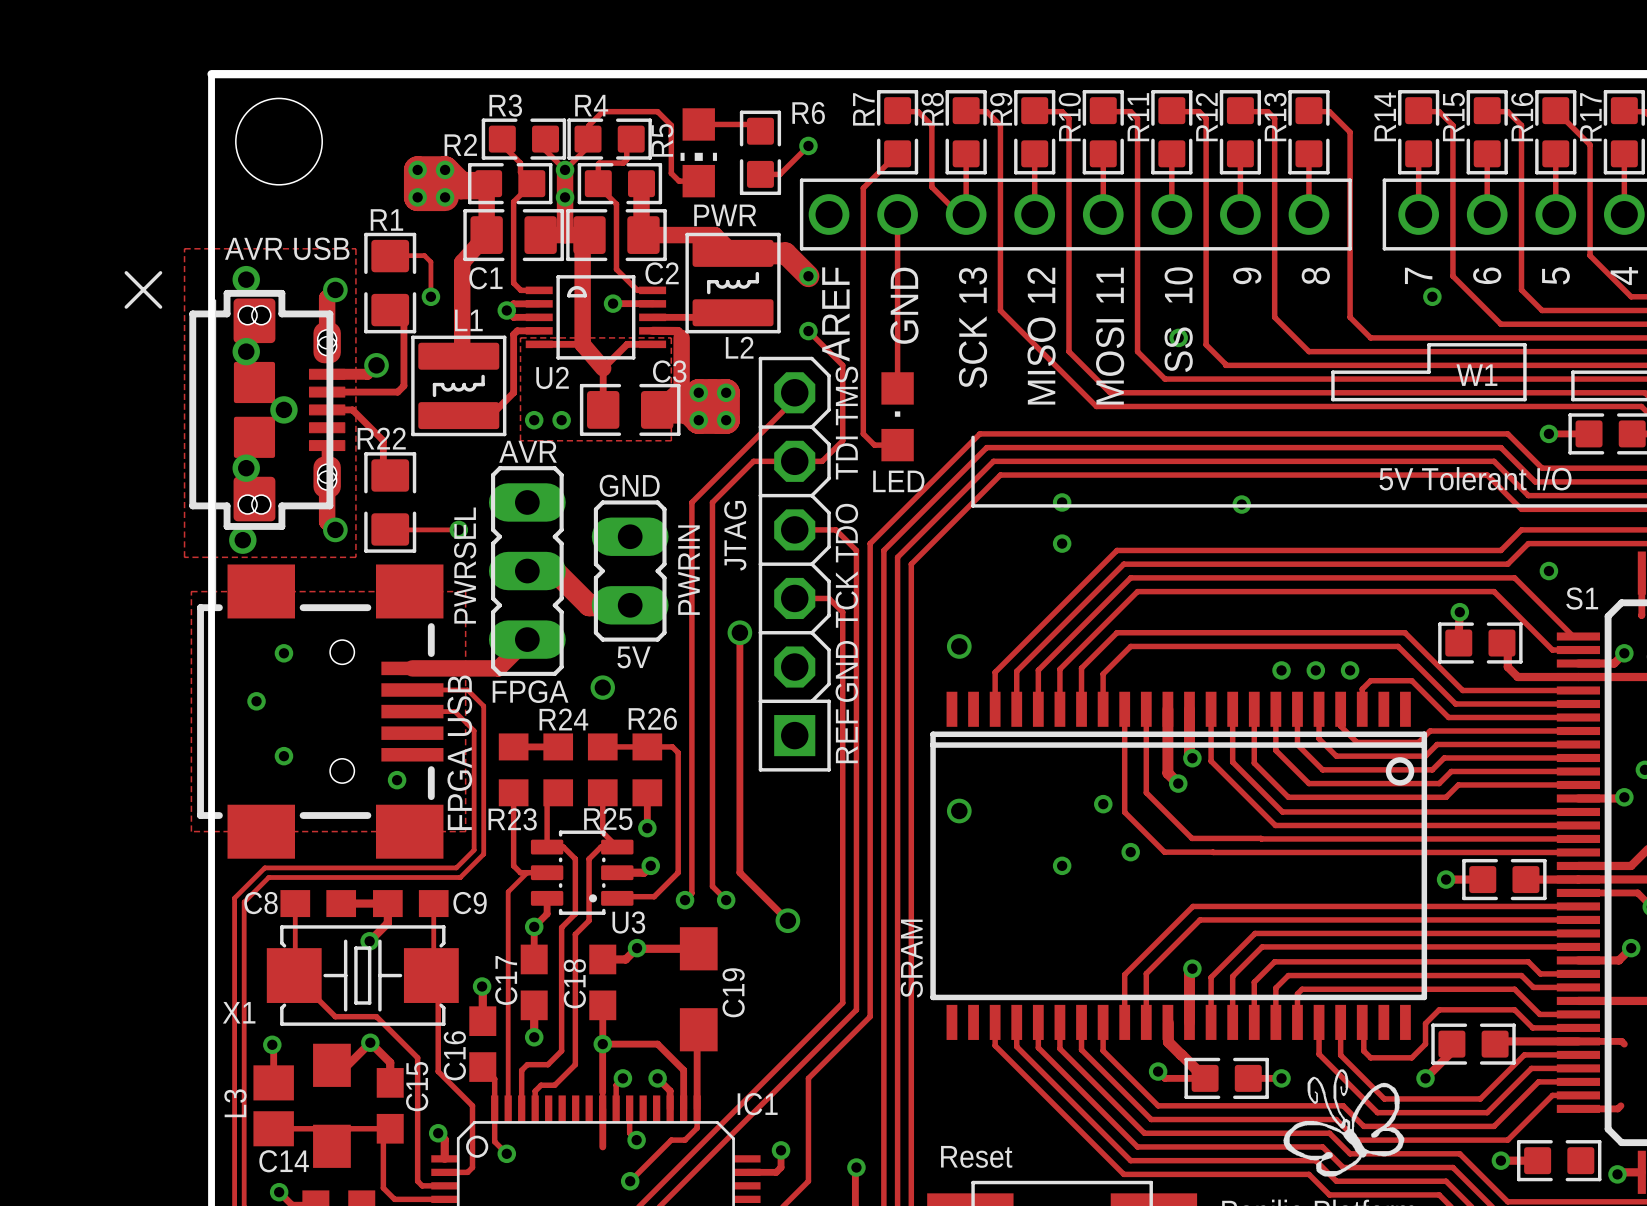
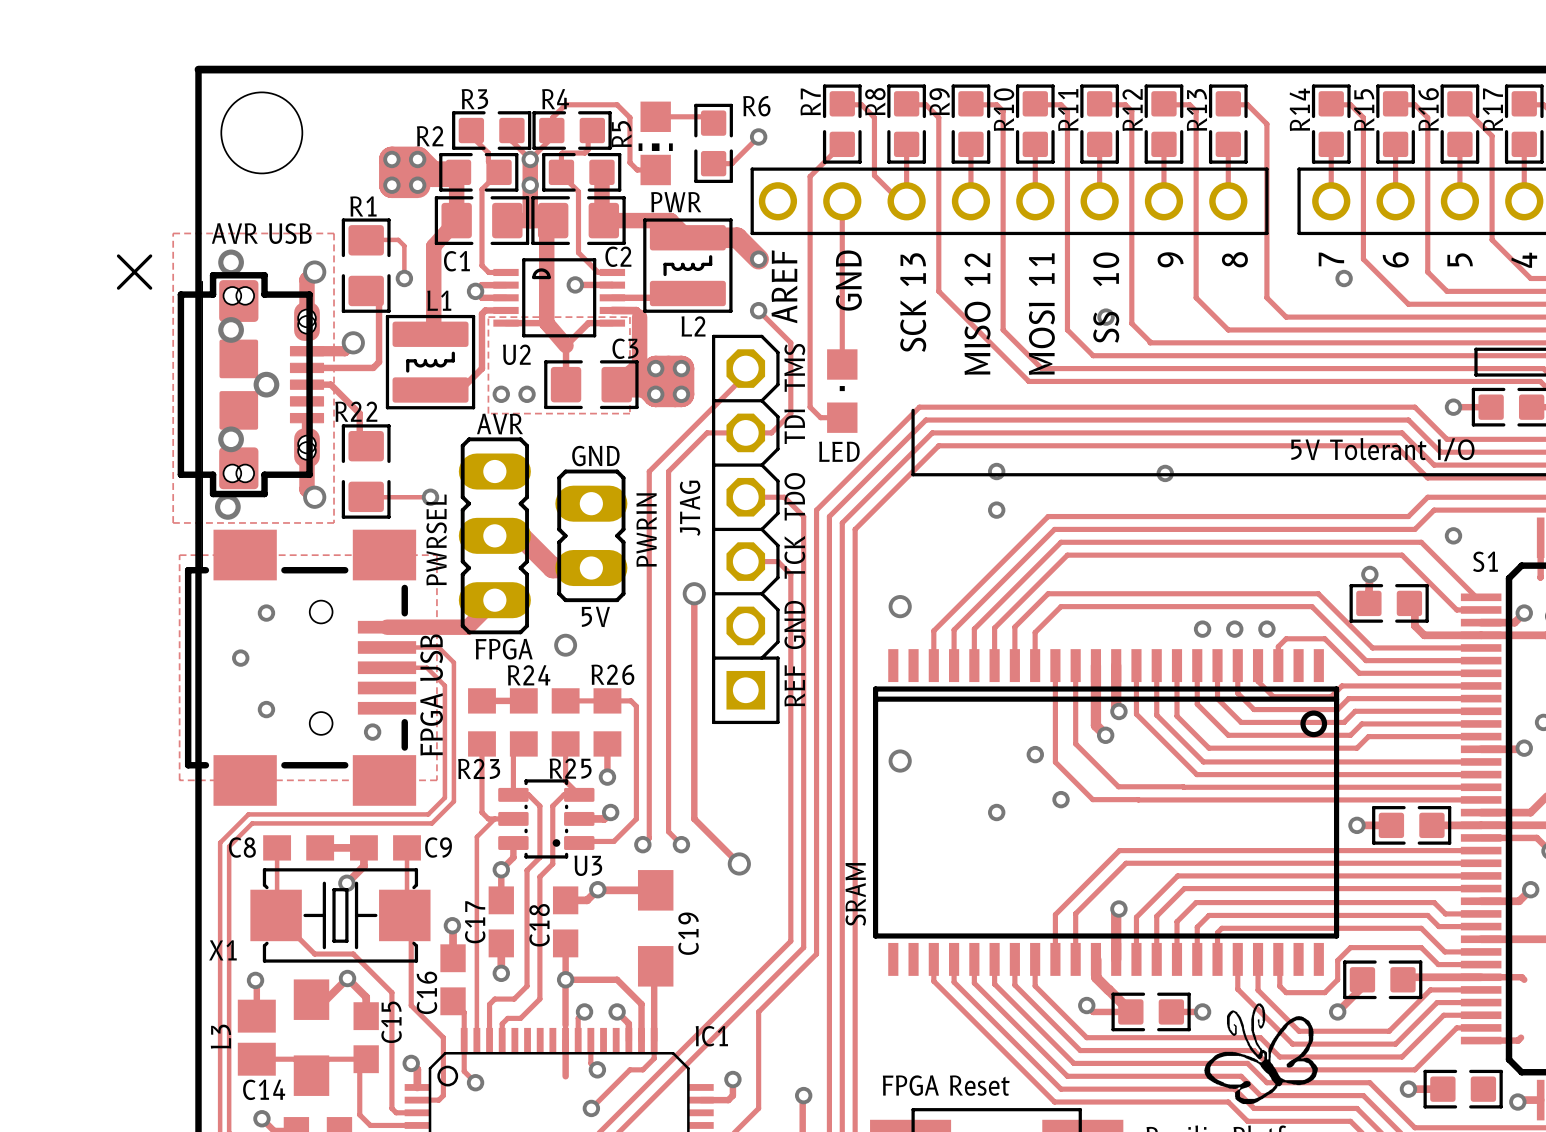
line: (1428, 344) (1524, 344) (1524, 399) (1332, 399) (1332, 372) (1428, 372) (1428, 344) -> none
text: W1 (1476, 375) -> none
text: Reset (976, 1156) -> FPGA Reset (946, 1085)

